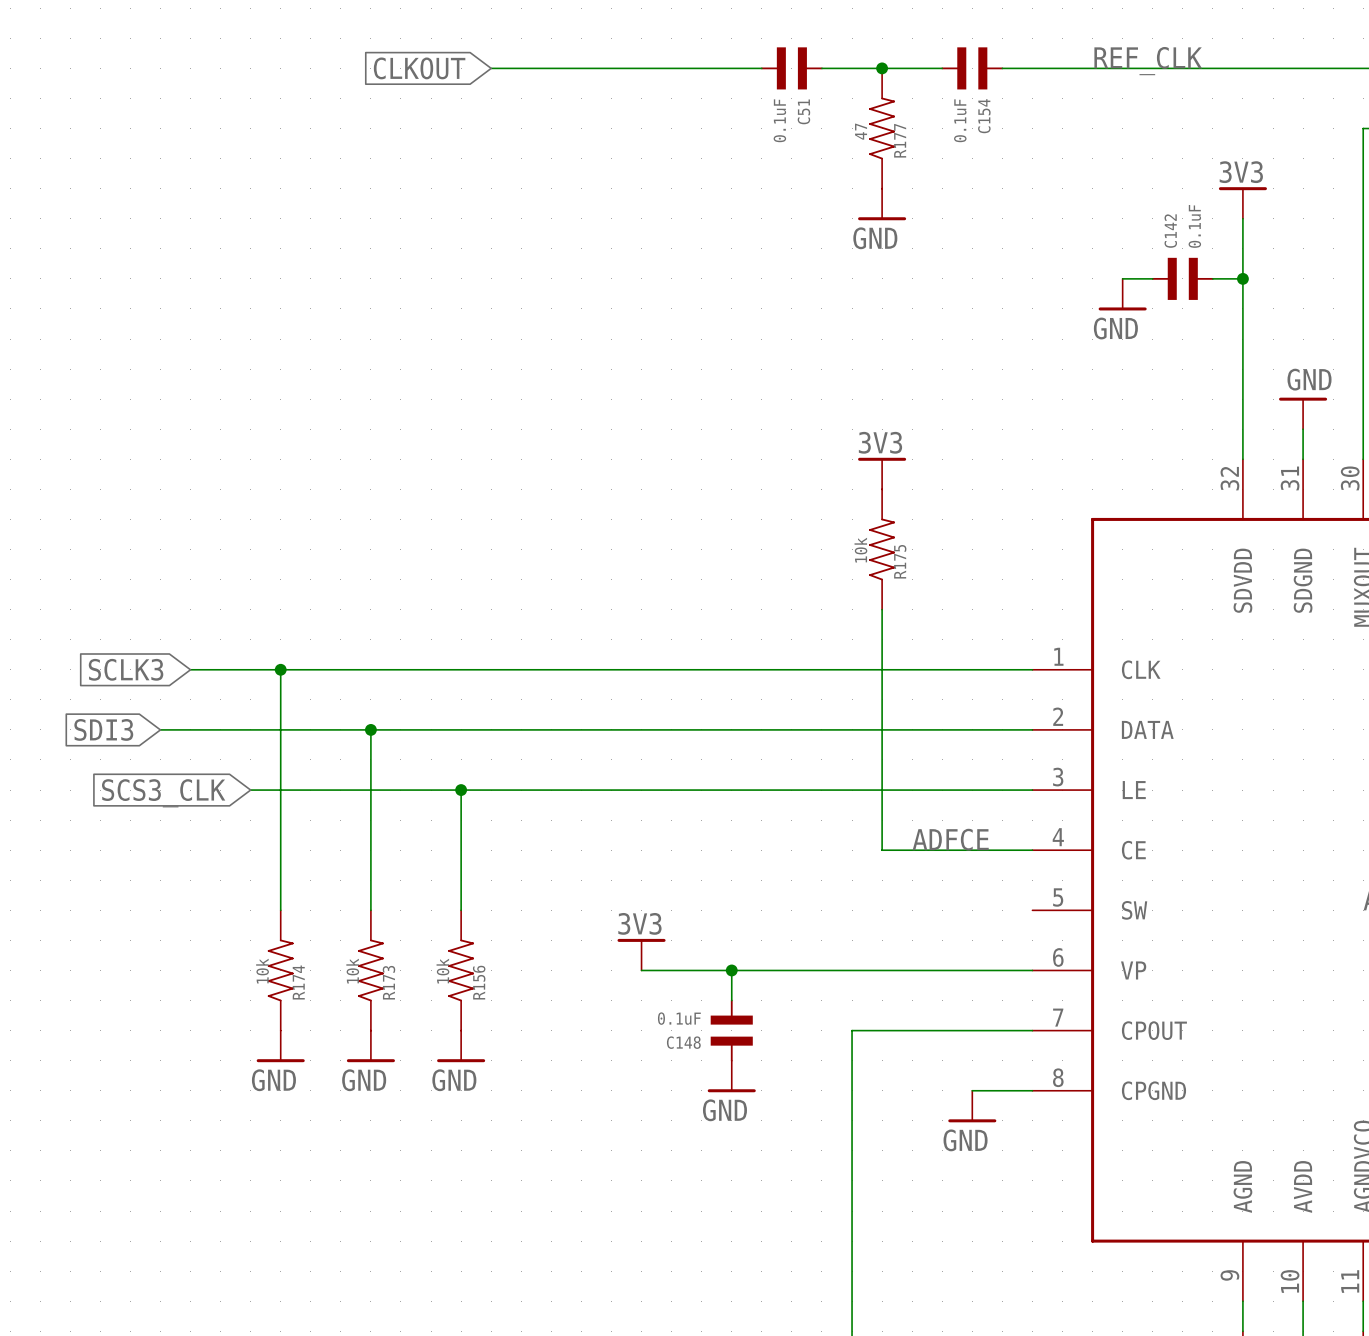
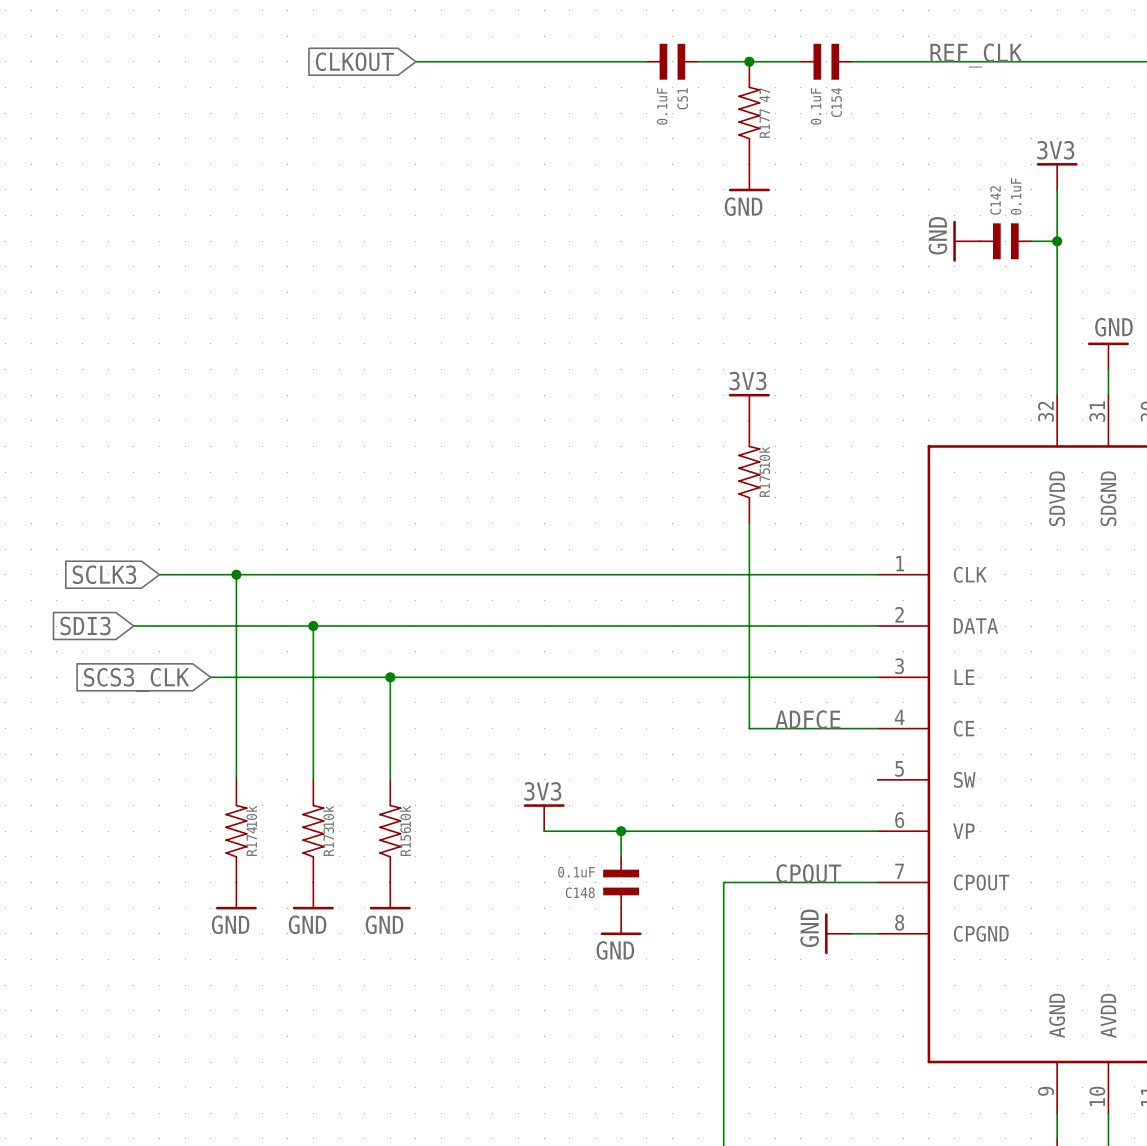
R177 value position: 47 (861, 131) -> 47 (764, 95)
power symbol rotation: 0° (1122, 308) -> 90° clockwise (954, 241)
R175 value position: 10k (860, 550) -> 10k (764, 457)
R174 value position: 10k (262, 971) -> 10k (251, 816)
R173 value position: 10k (352, 971) -> 10k (328, 816)
R156 value position: 10k (442, 971) -> 10k (405, 816)
label: none -> CPOUT (808, 873)
power symbol rotation: 0° (972, 1120) -> 90° clockwise (826, 933)

